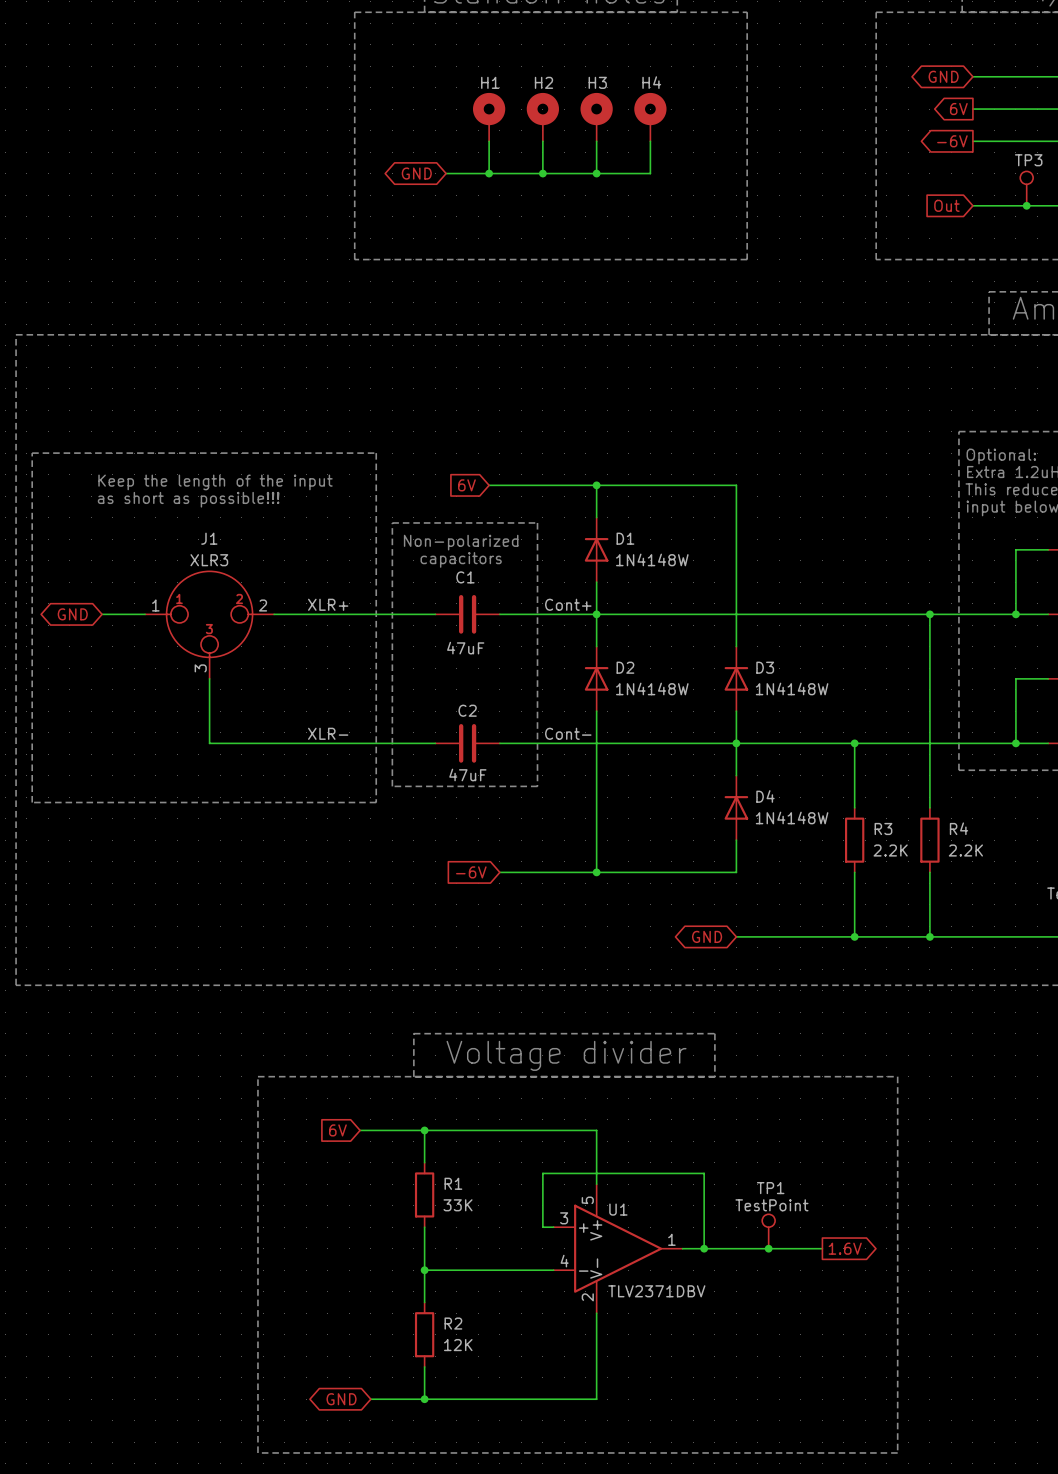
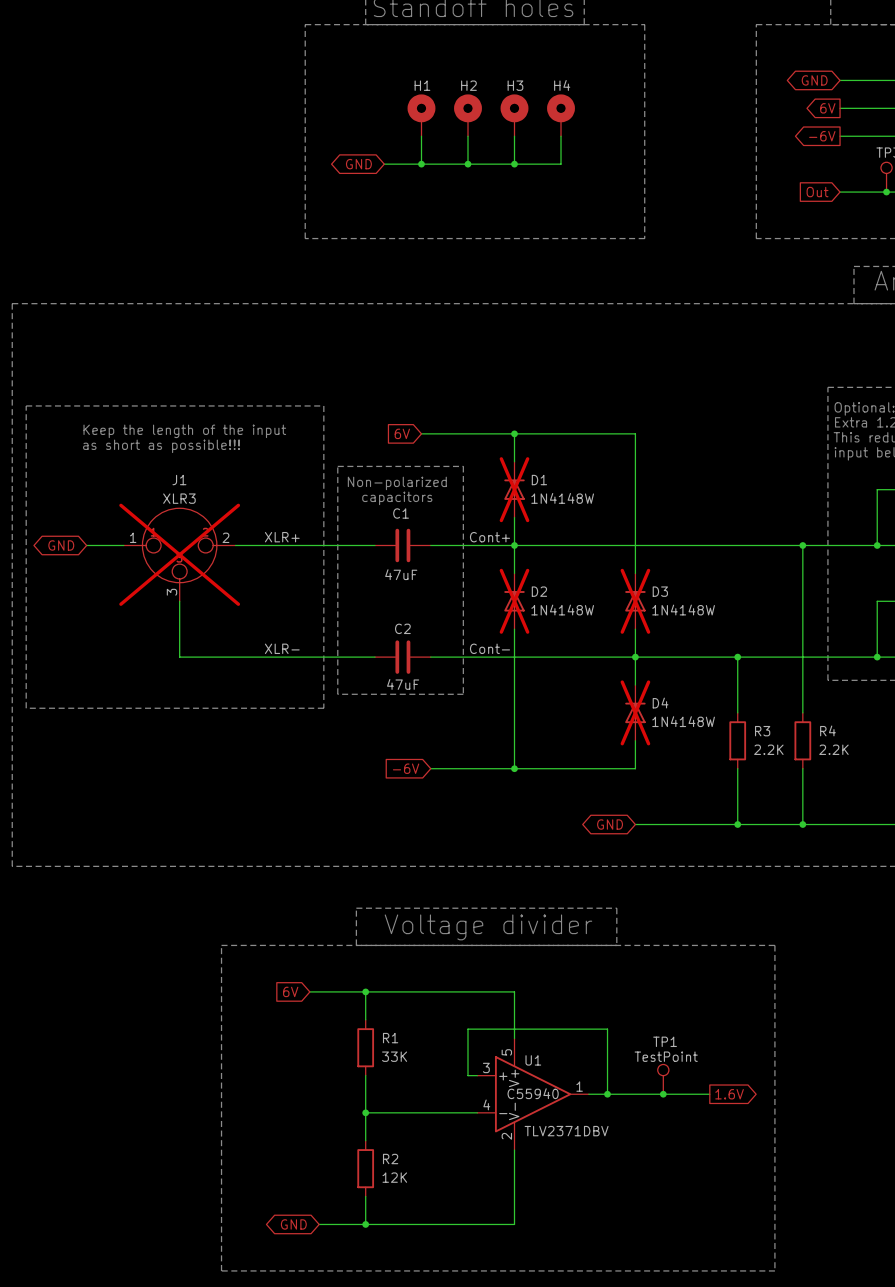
D1 do-not-place cross: none -> (514, 489)
J1 do-not-place cross: none -> (179, 554)
D2 do-not-place cross: none -> (514, 601)
D3 do-not-place cross: none -> (635, 601)
D4 do-not-place cross: none -> (635, 712)
U1 text: none -> C55940 (533, 1093)

